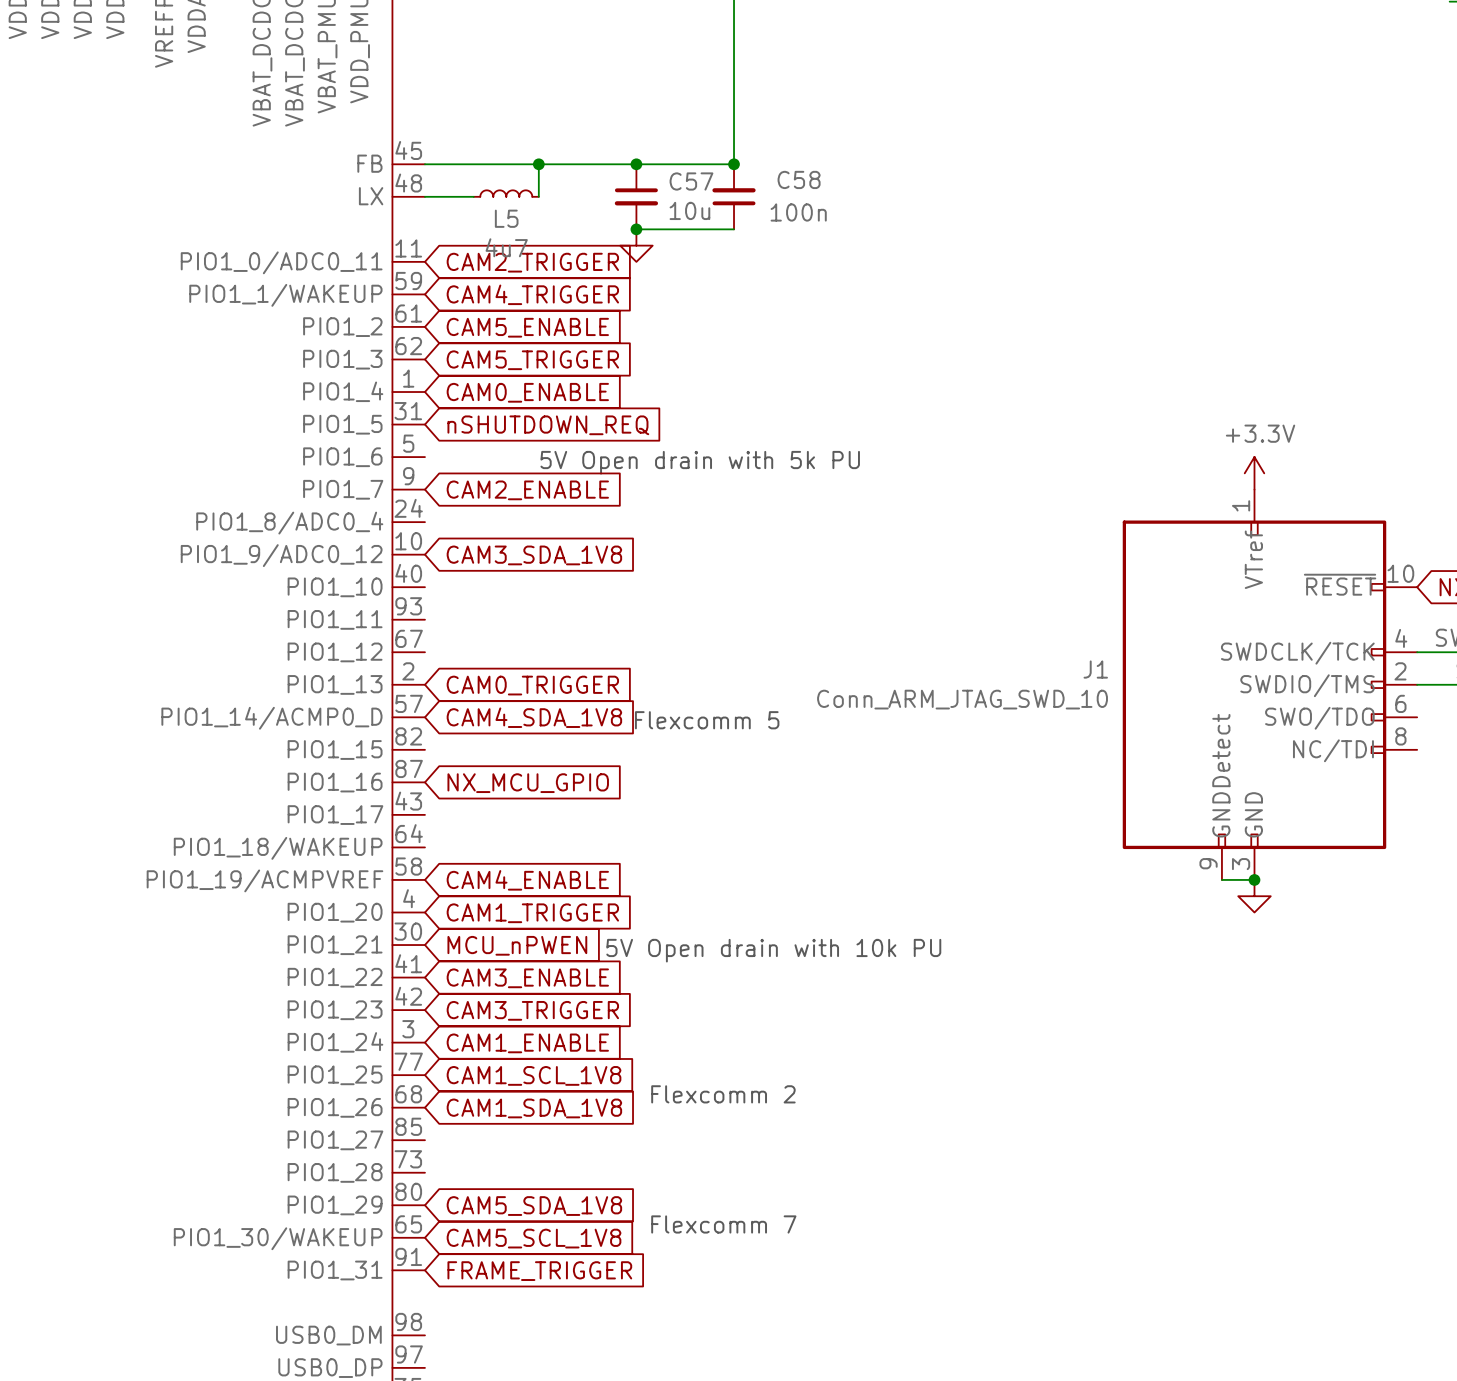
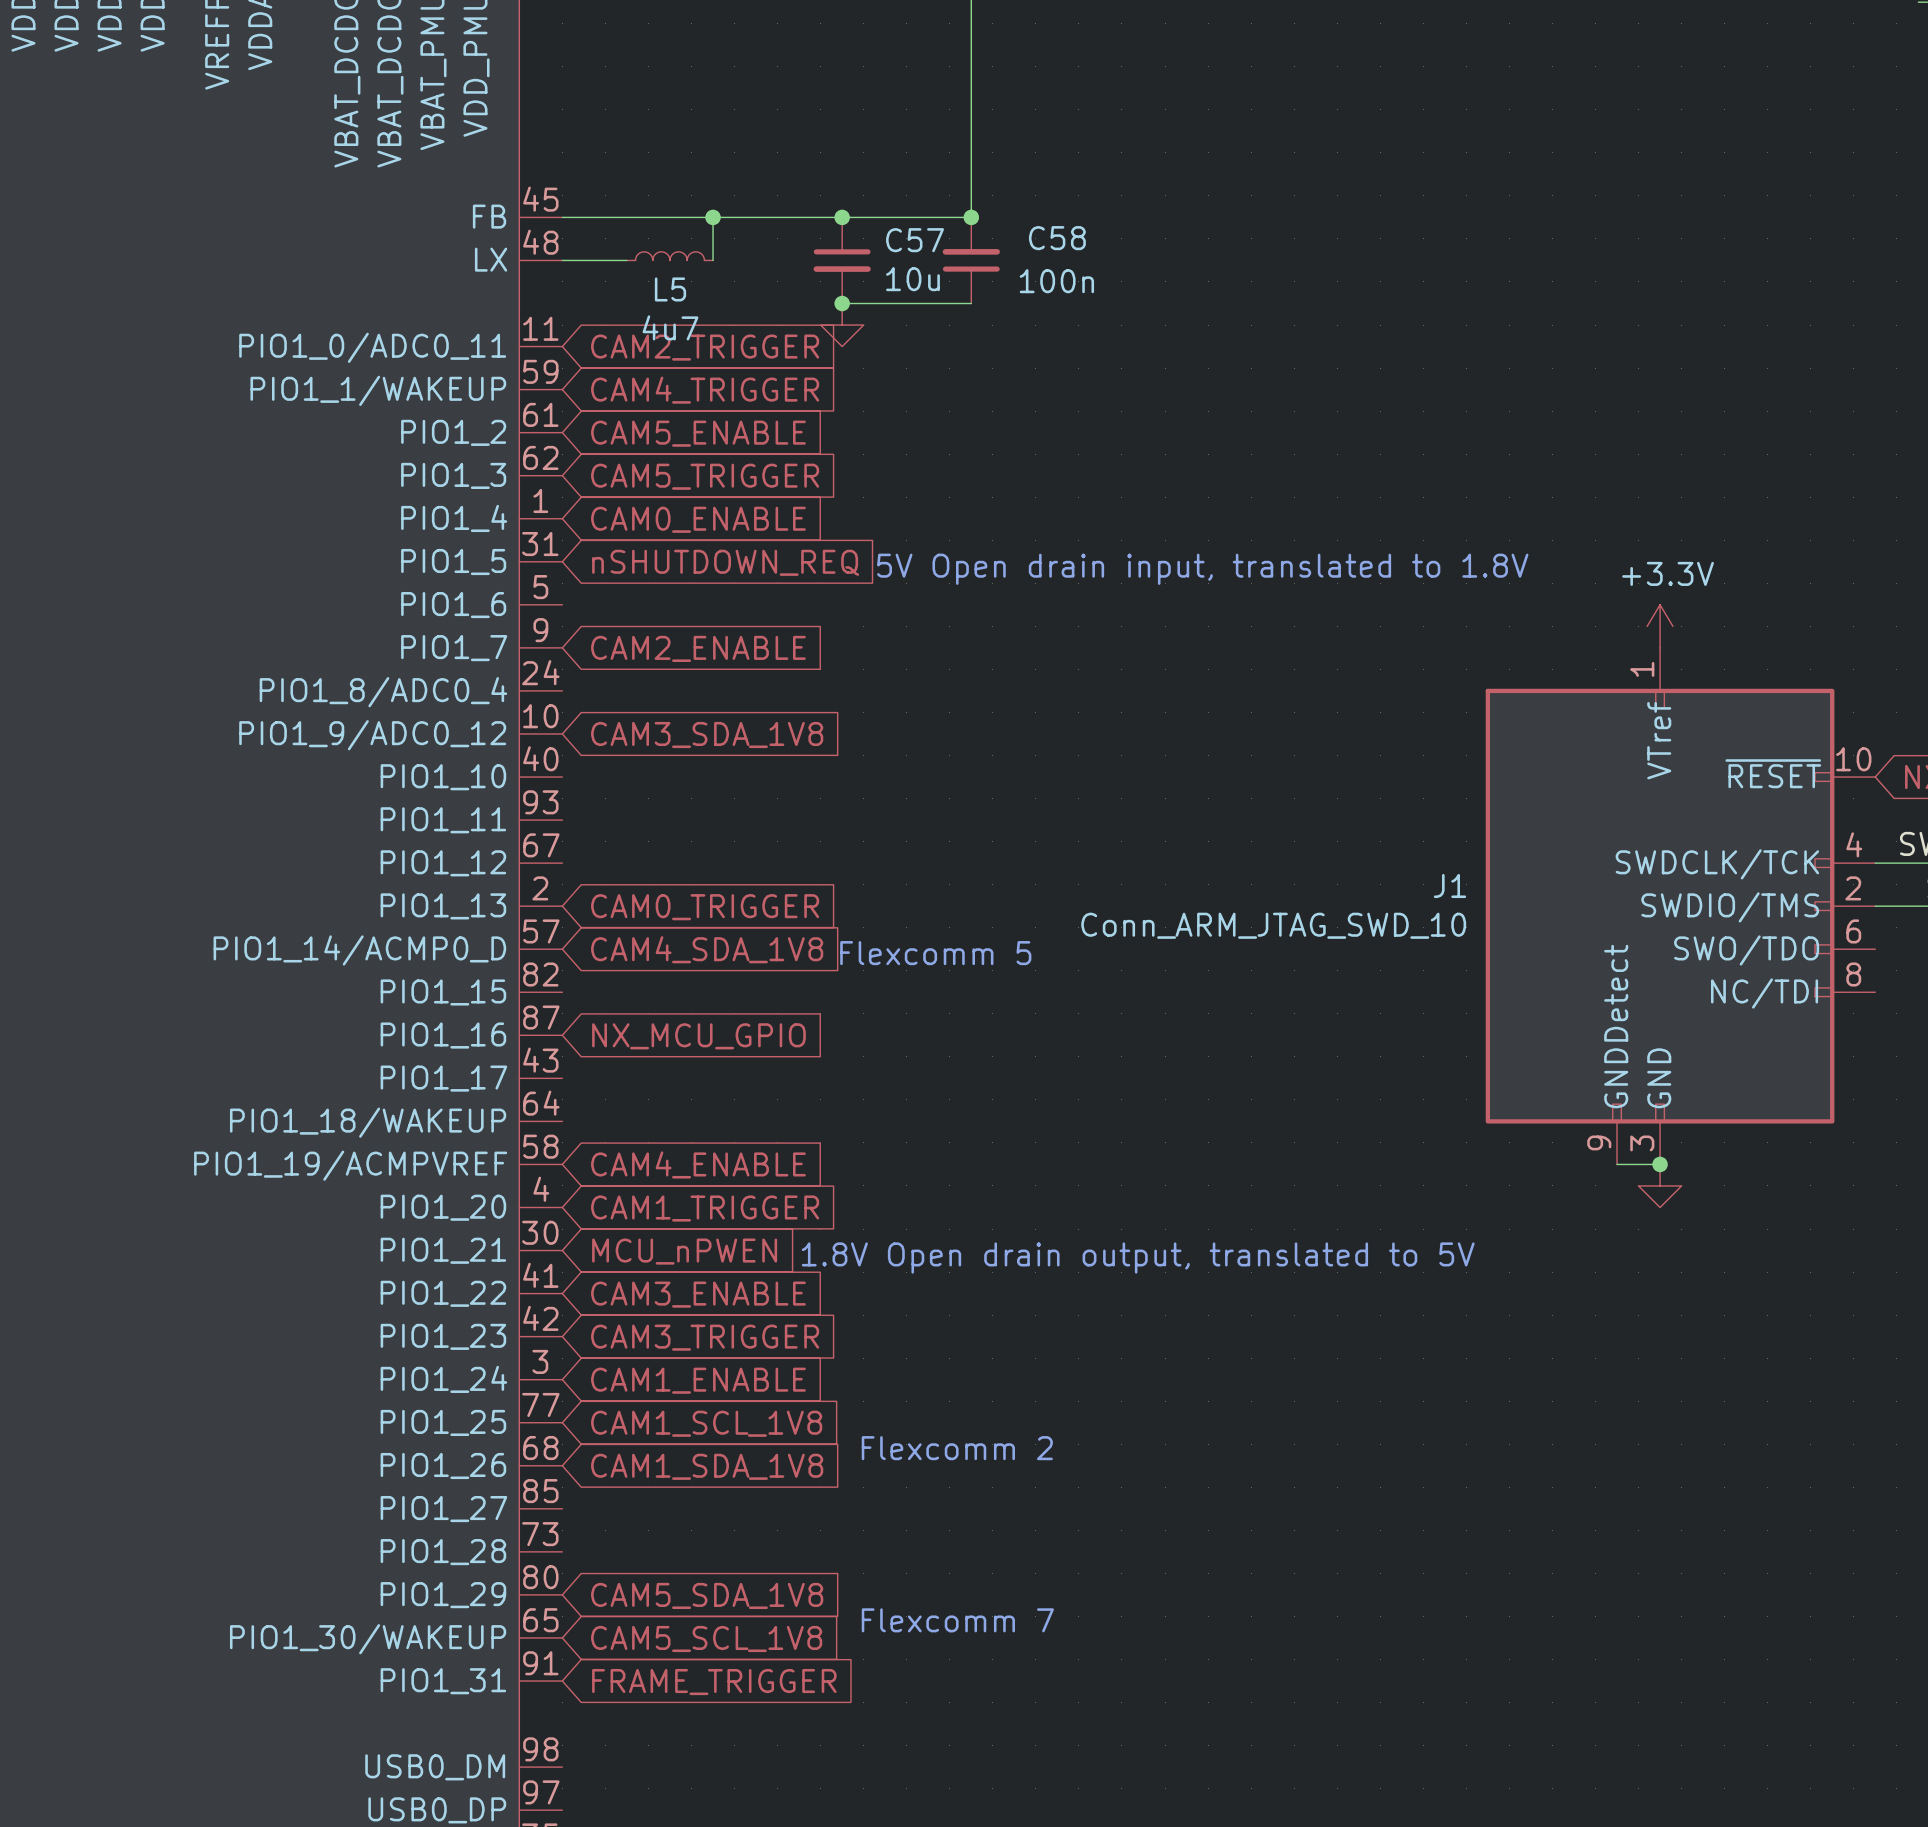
text: none -> 5V Open drain input, translated to 1.8V (1202, 569)
text: 5V Open drain with 5k PU (700, 462) -> none
text: 5V Open drain with 10k PU (773, 950) -> none
text: none -> 1.8V Open drain output, translated to 5V (1138, 1258)

